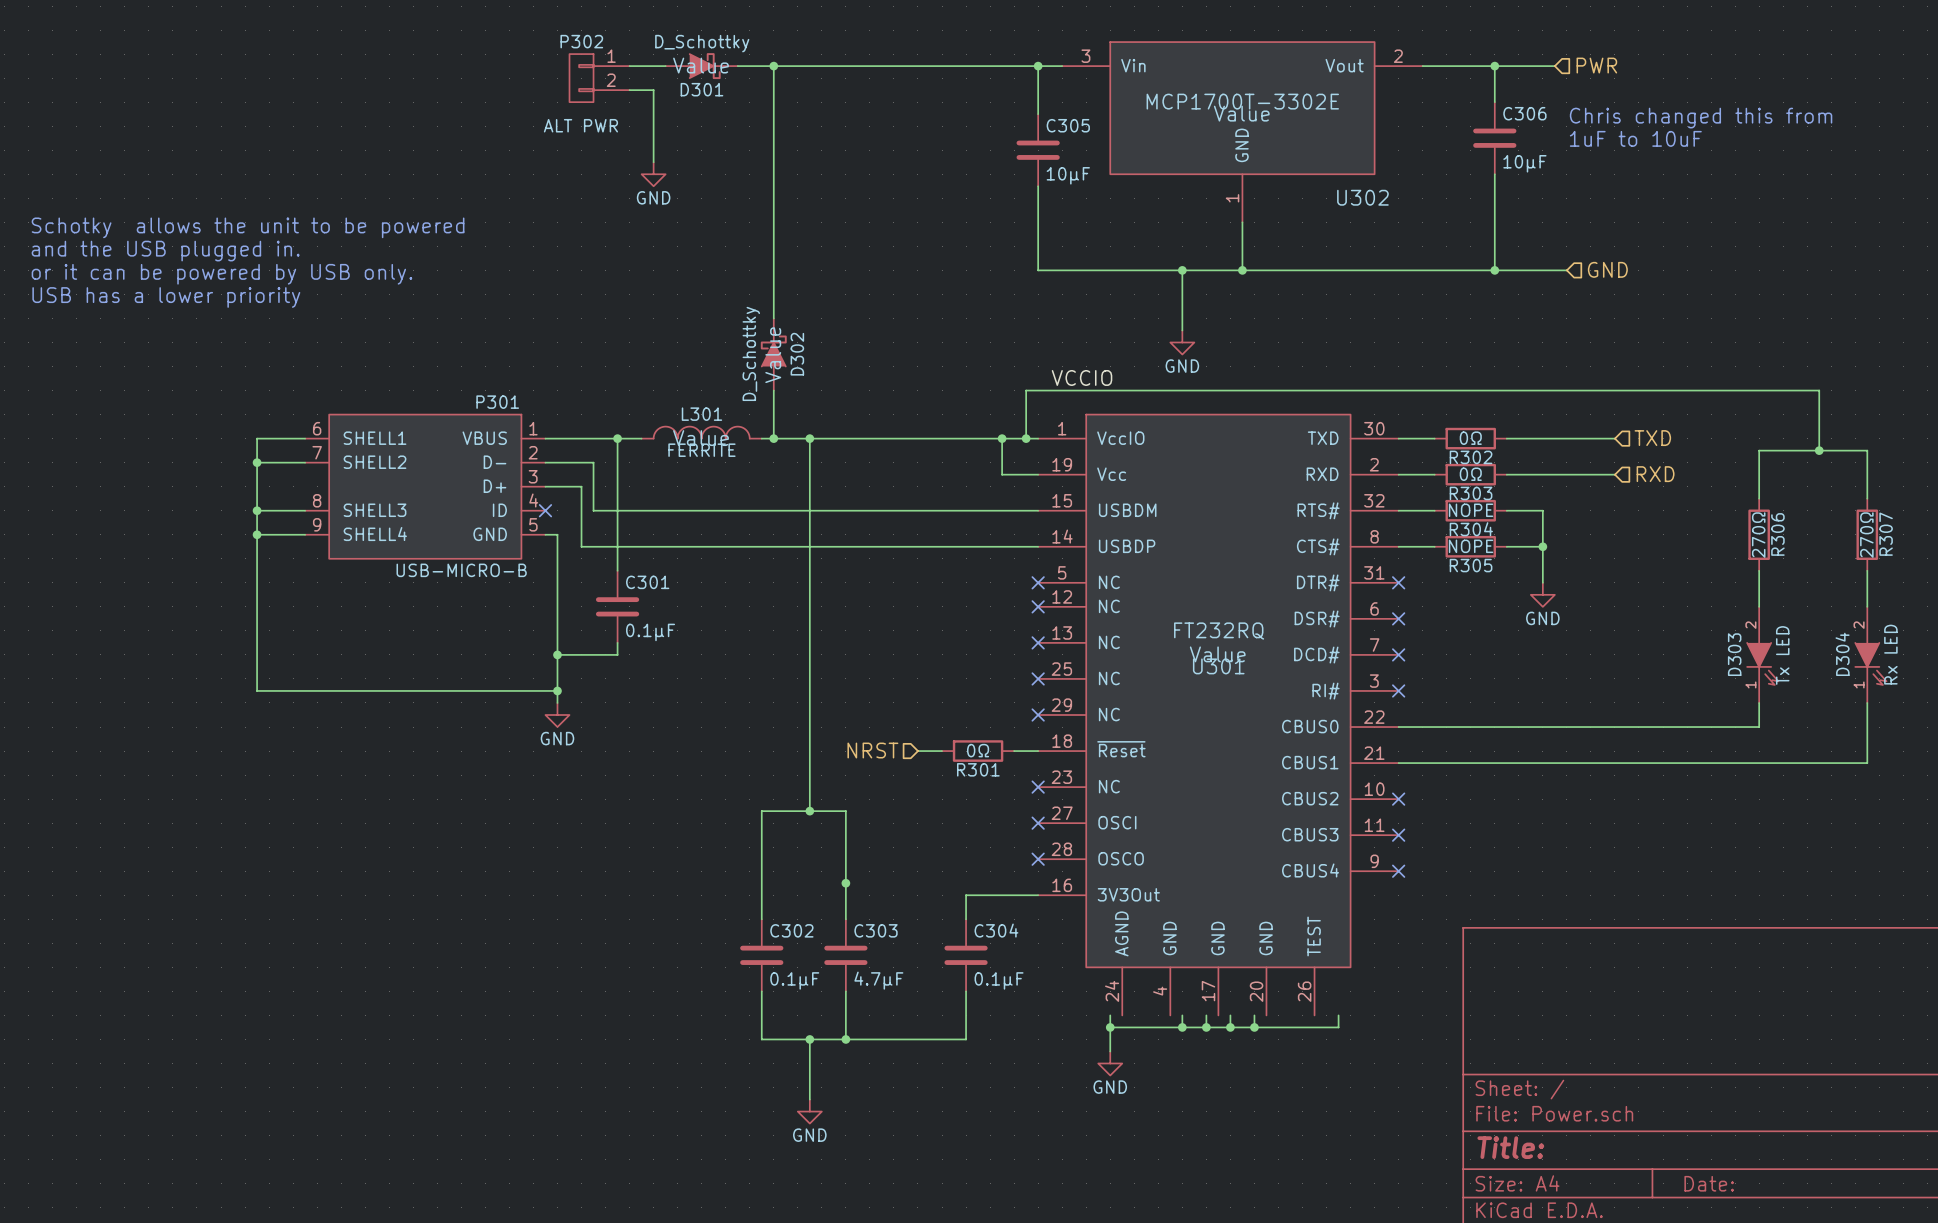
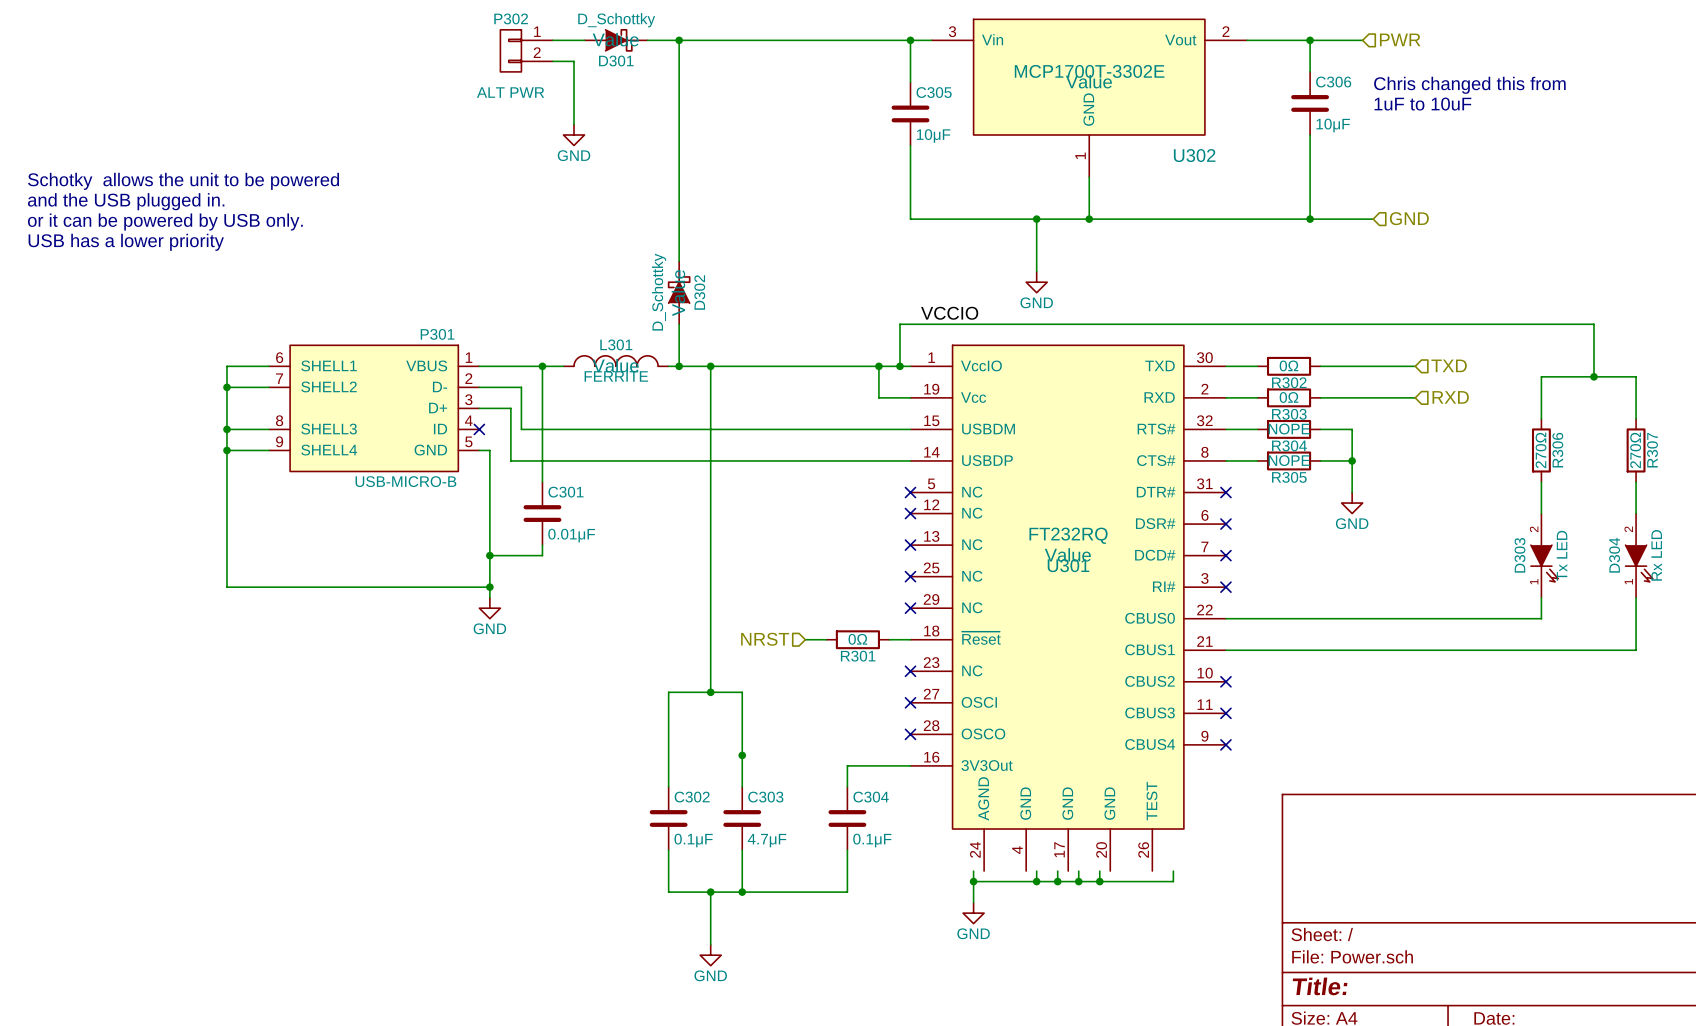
C301 value: 0.1μF (650, 632) -> 0.01μF (571, 535)

